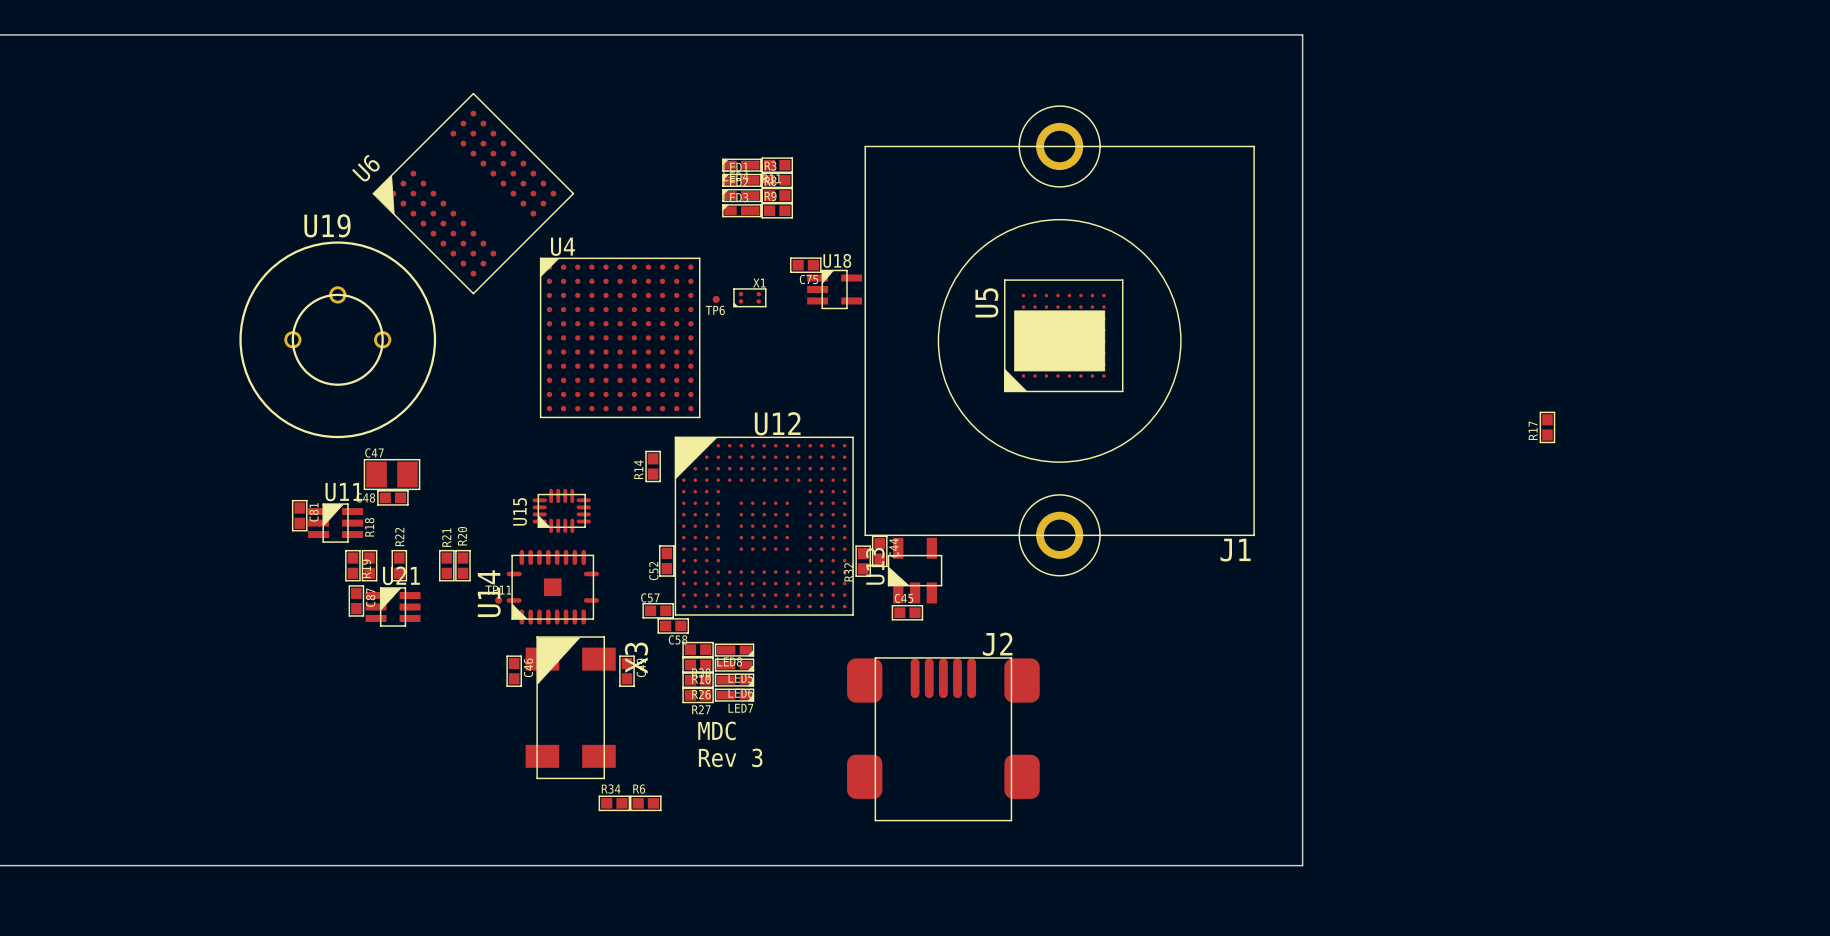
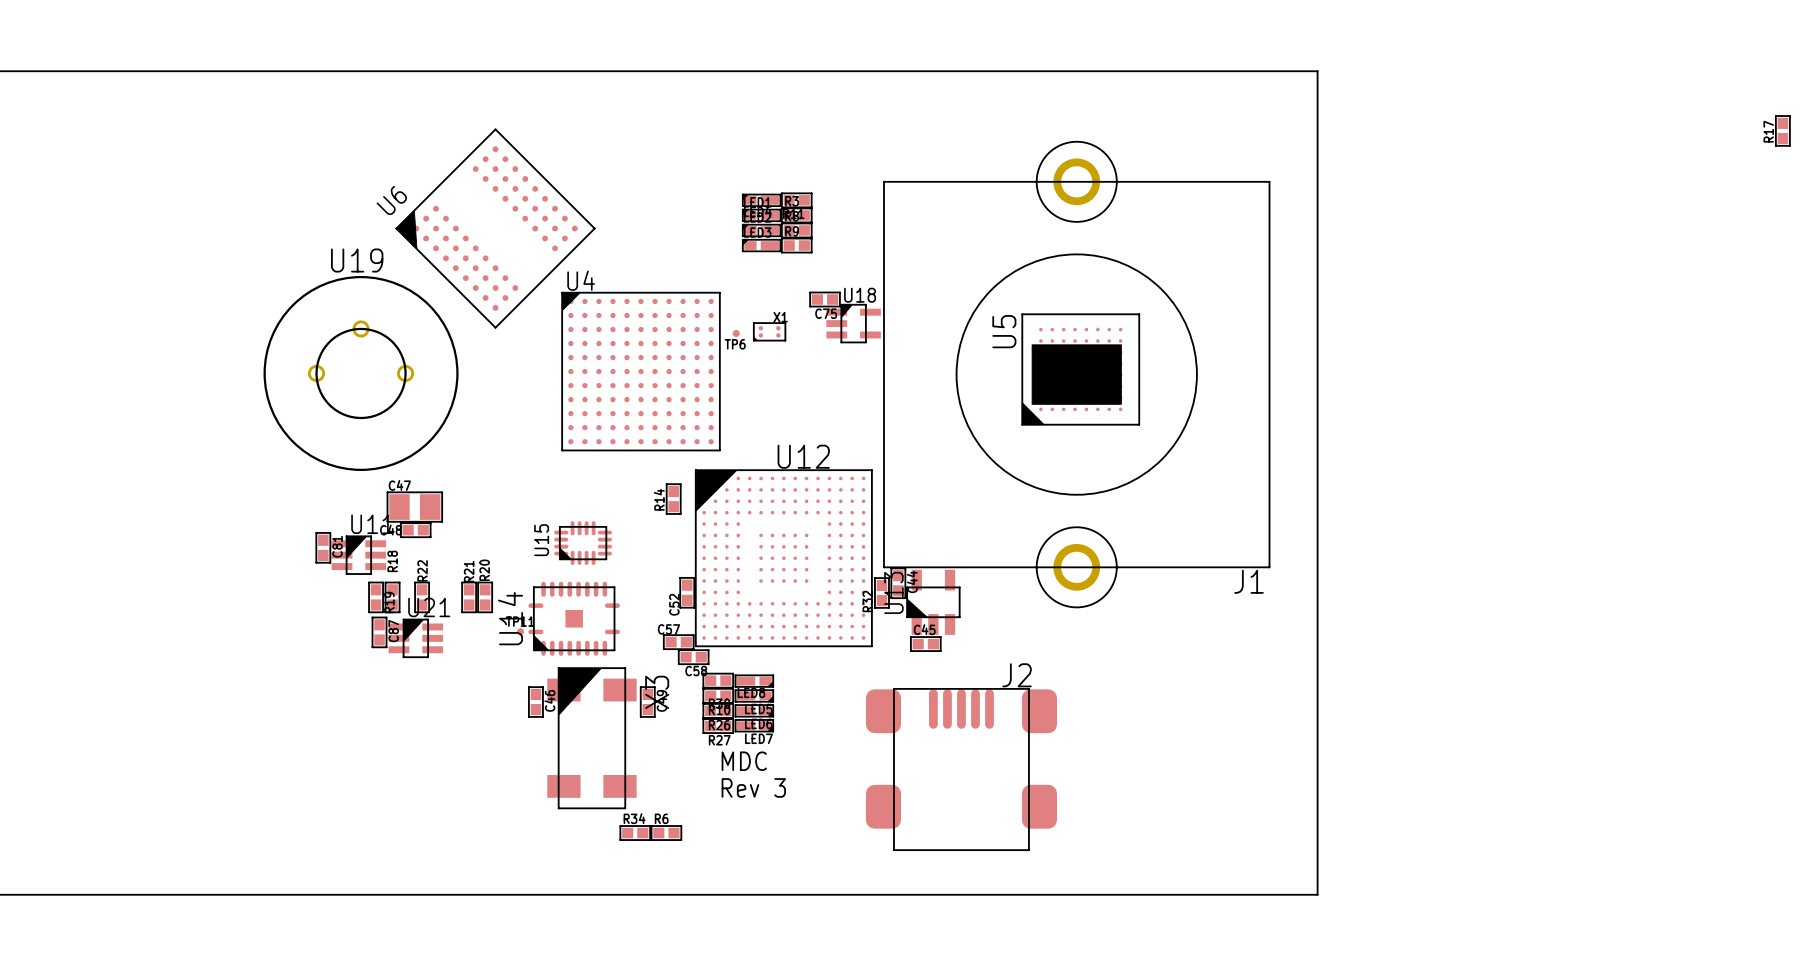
R17 position: (1547, 427) -> (1782, 130)

